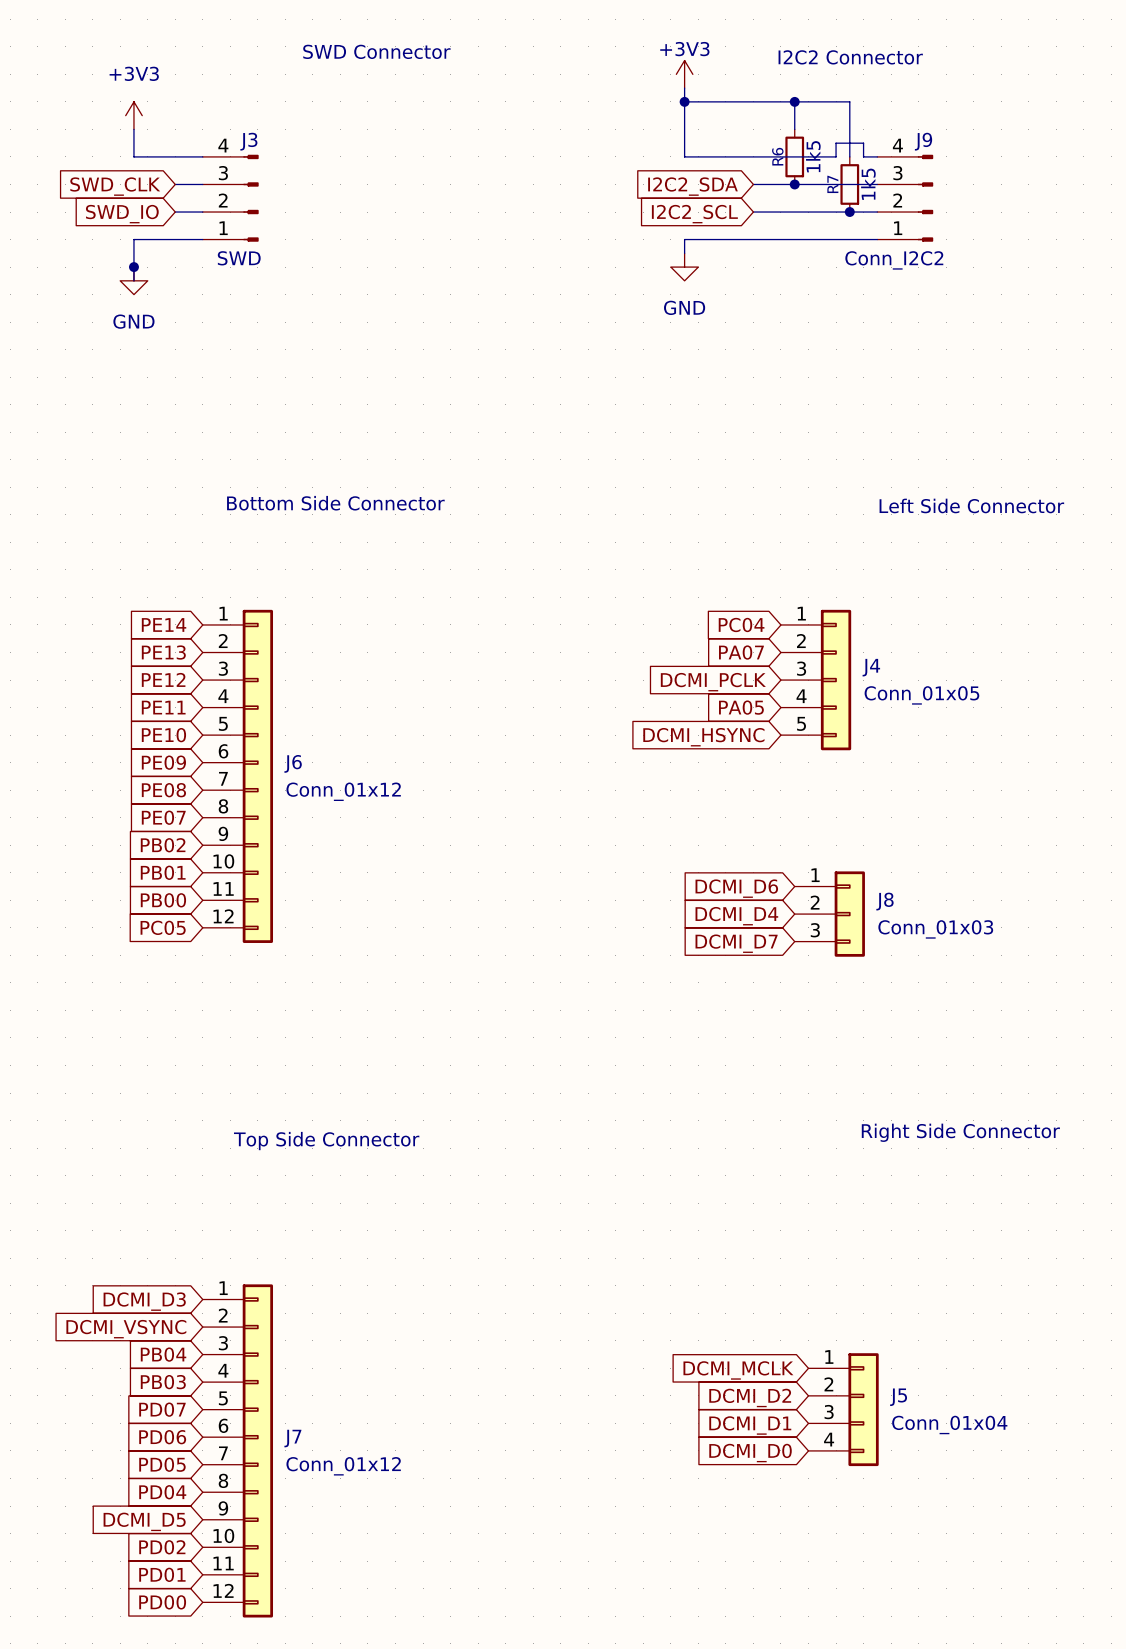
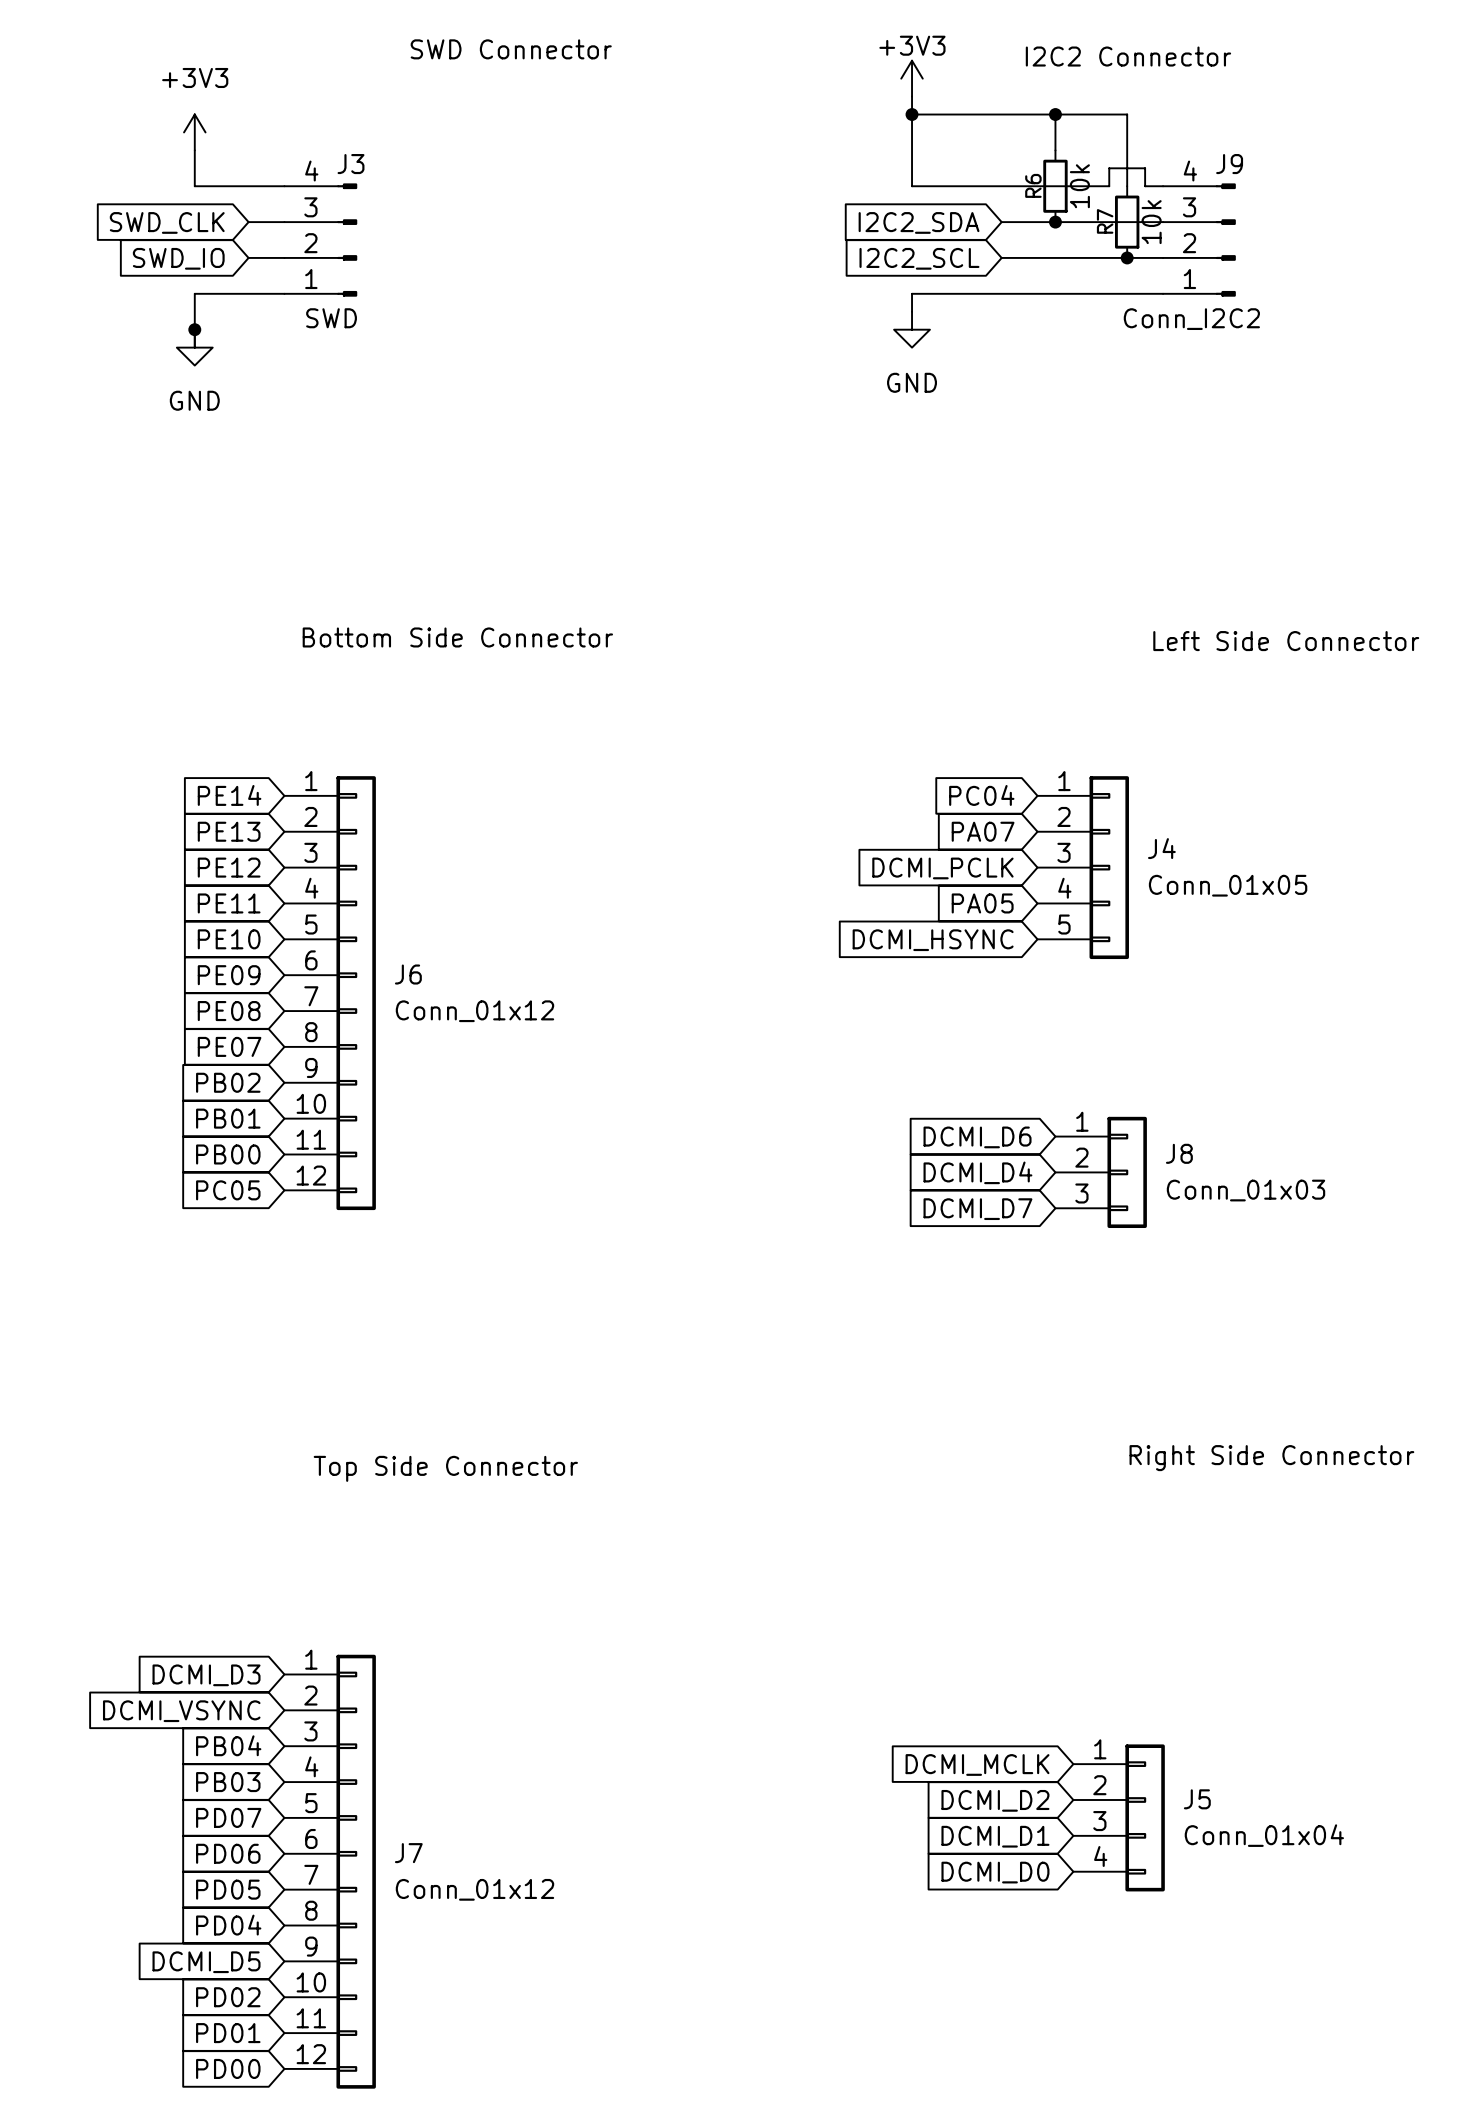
R6 value: 1k5 (813, 156) -> 10k (1079, 186)
R7 value: 1k5 (868, 184) -> 10k (1151, 222)

